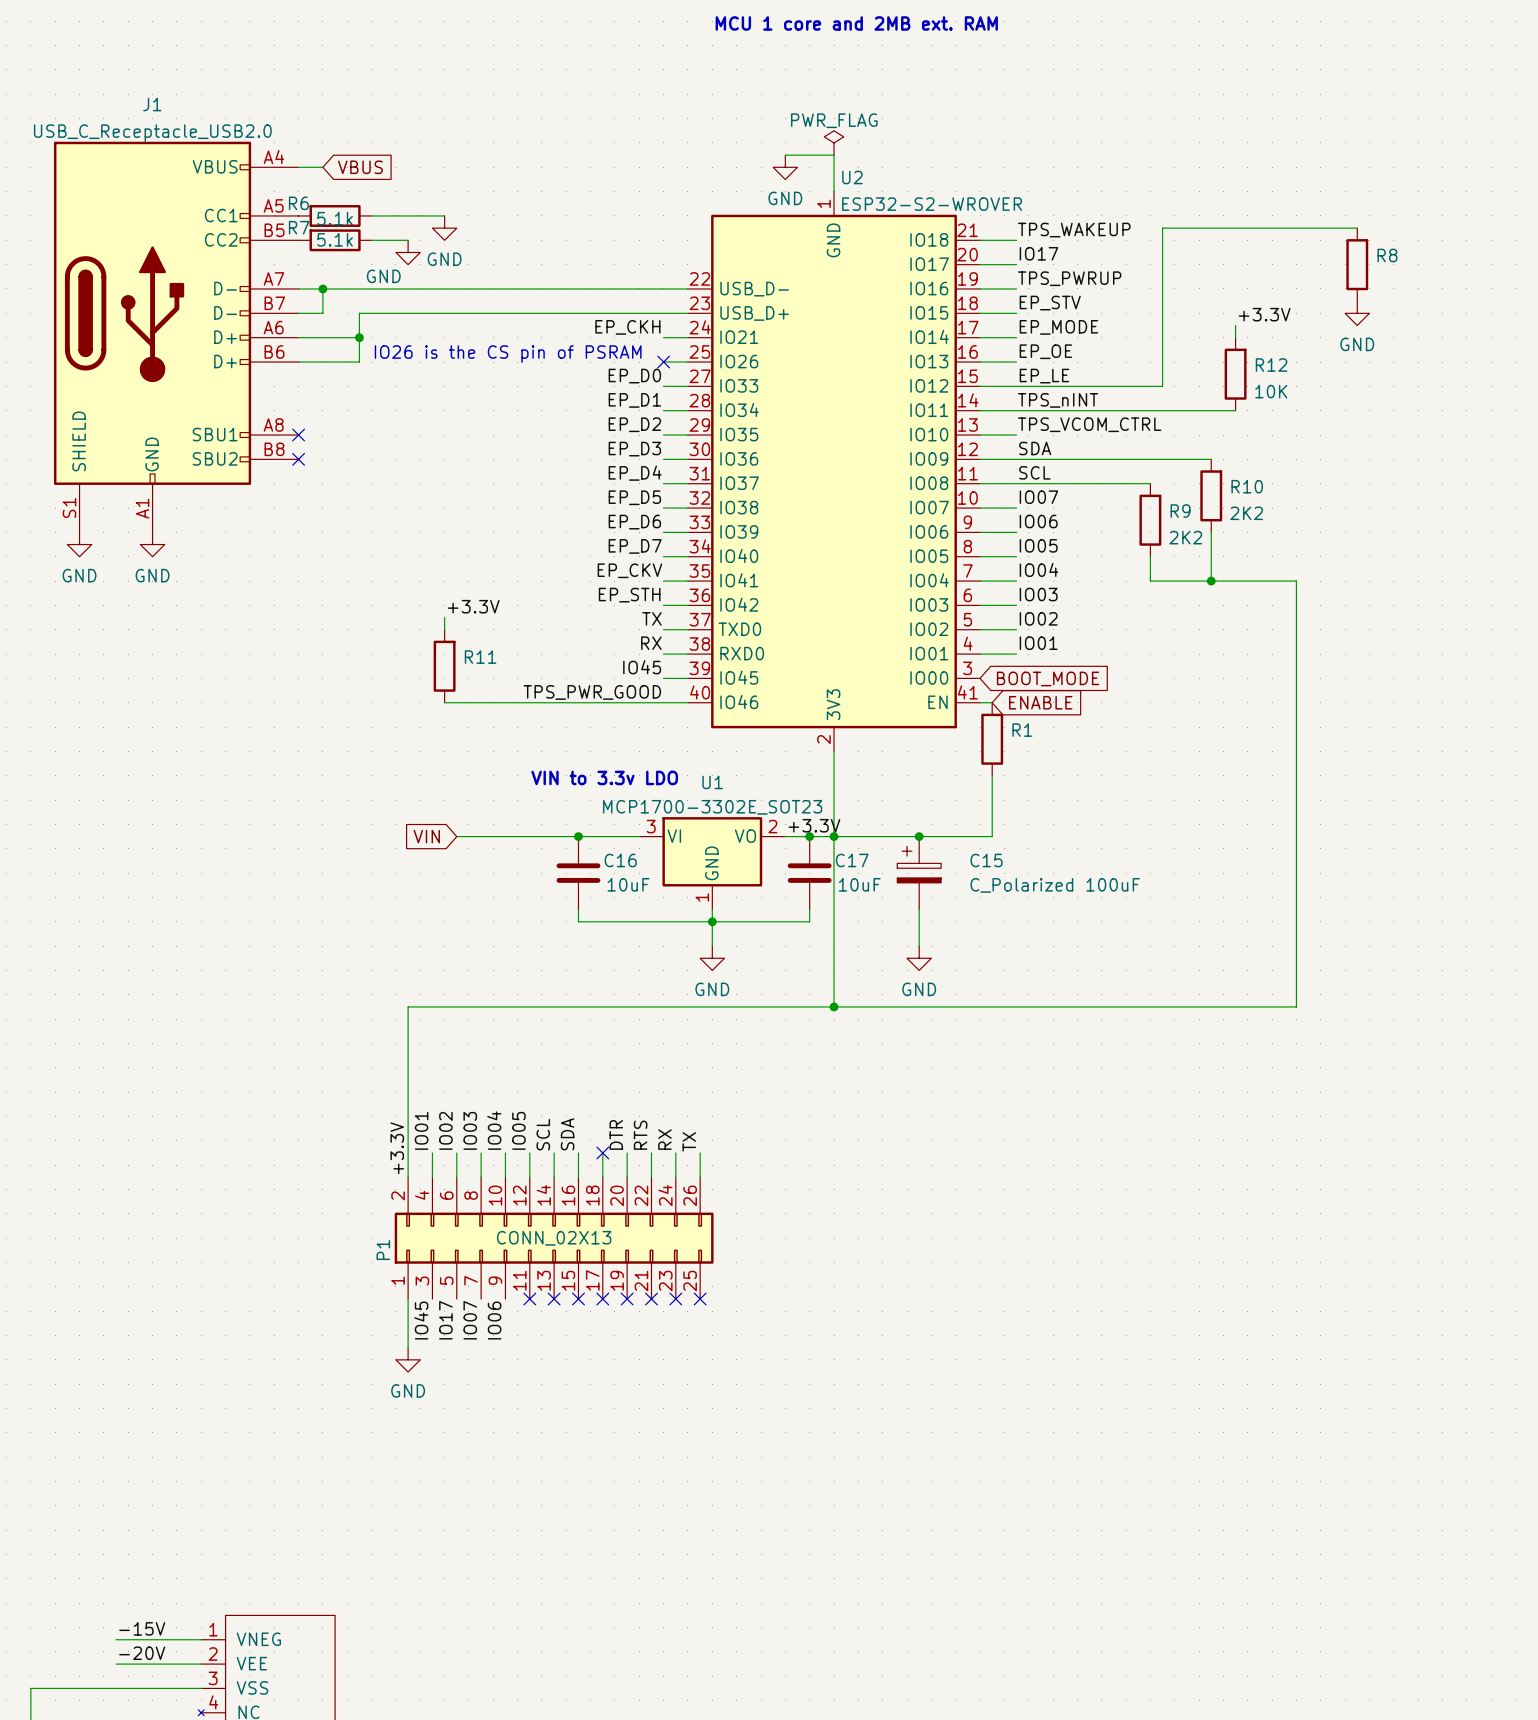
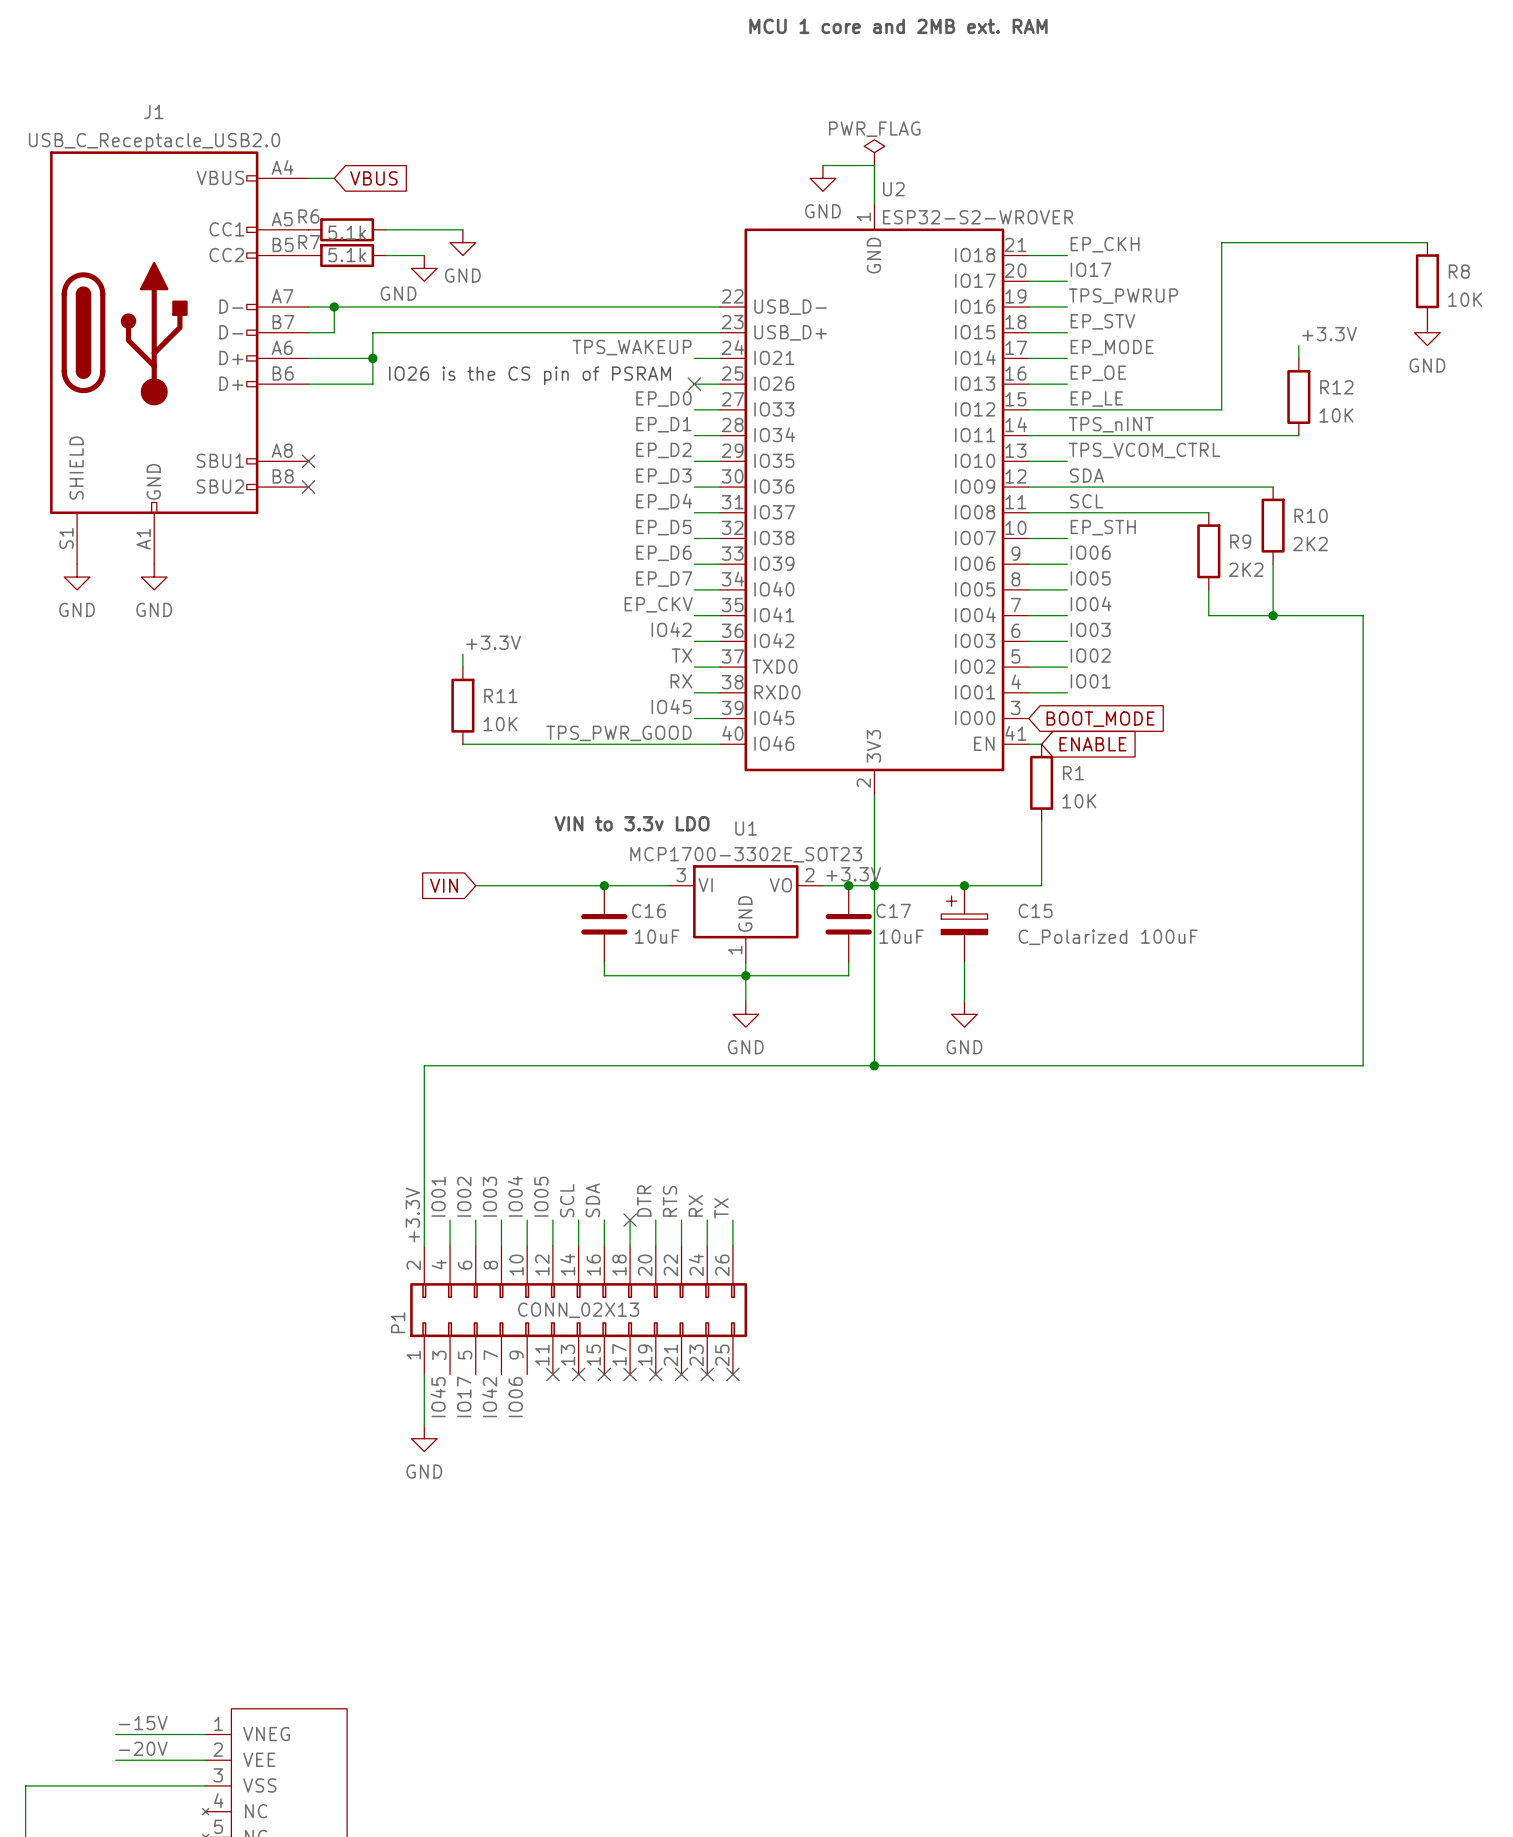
label: TPS_WAKEUP (1074, 230) -> EP_CKH (1105, 244)
R8 value: none -> 10K (1465, 299)
label: EP_CKH (627, 327) -> TPS_WAKEUP (632, 347)
label: IO07 (1038, 497) -> EP_STH (1103, 527)
label: EP_STH (629, 595) -> IO42 (671, 629)
R11 value: none -> 10K (500, 724)
R1 value: none -> 10K (1079, 801)
label: IO07 (470, 1320) -> IO42 (489, 1397)

